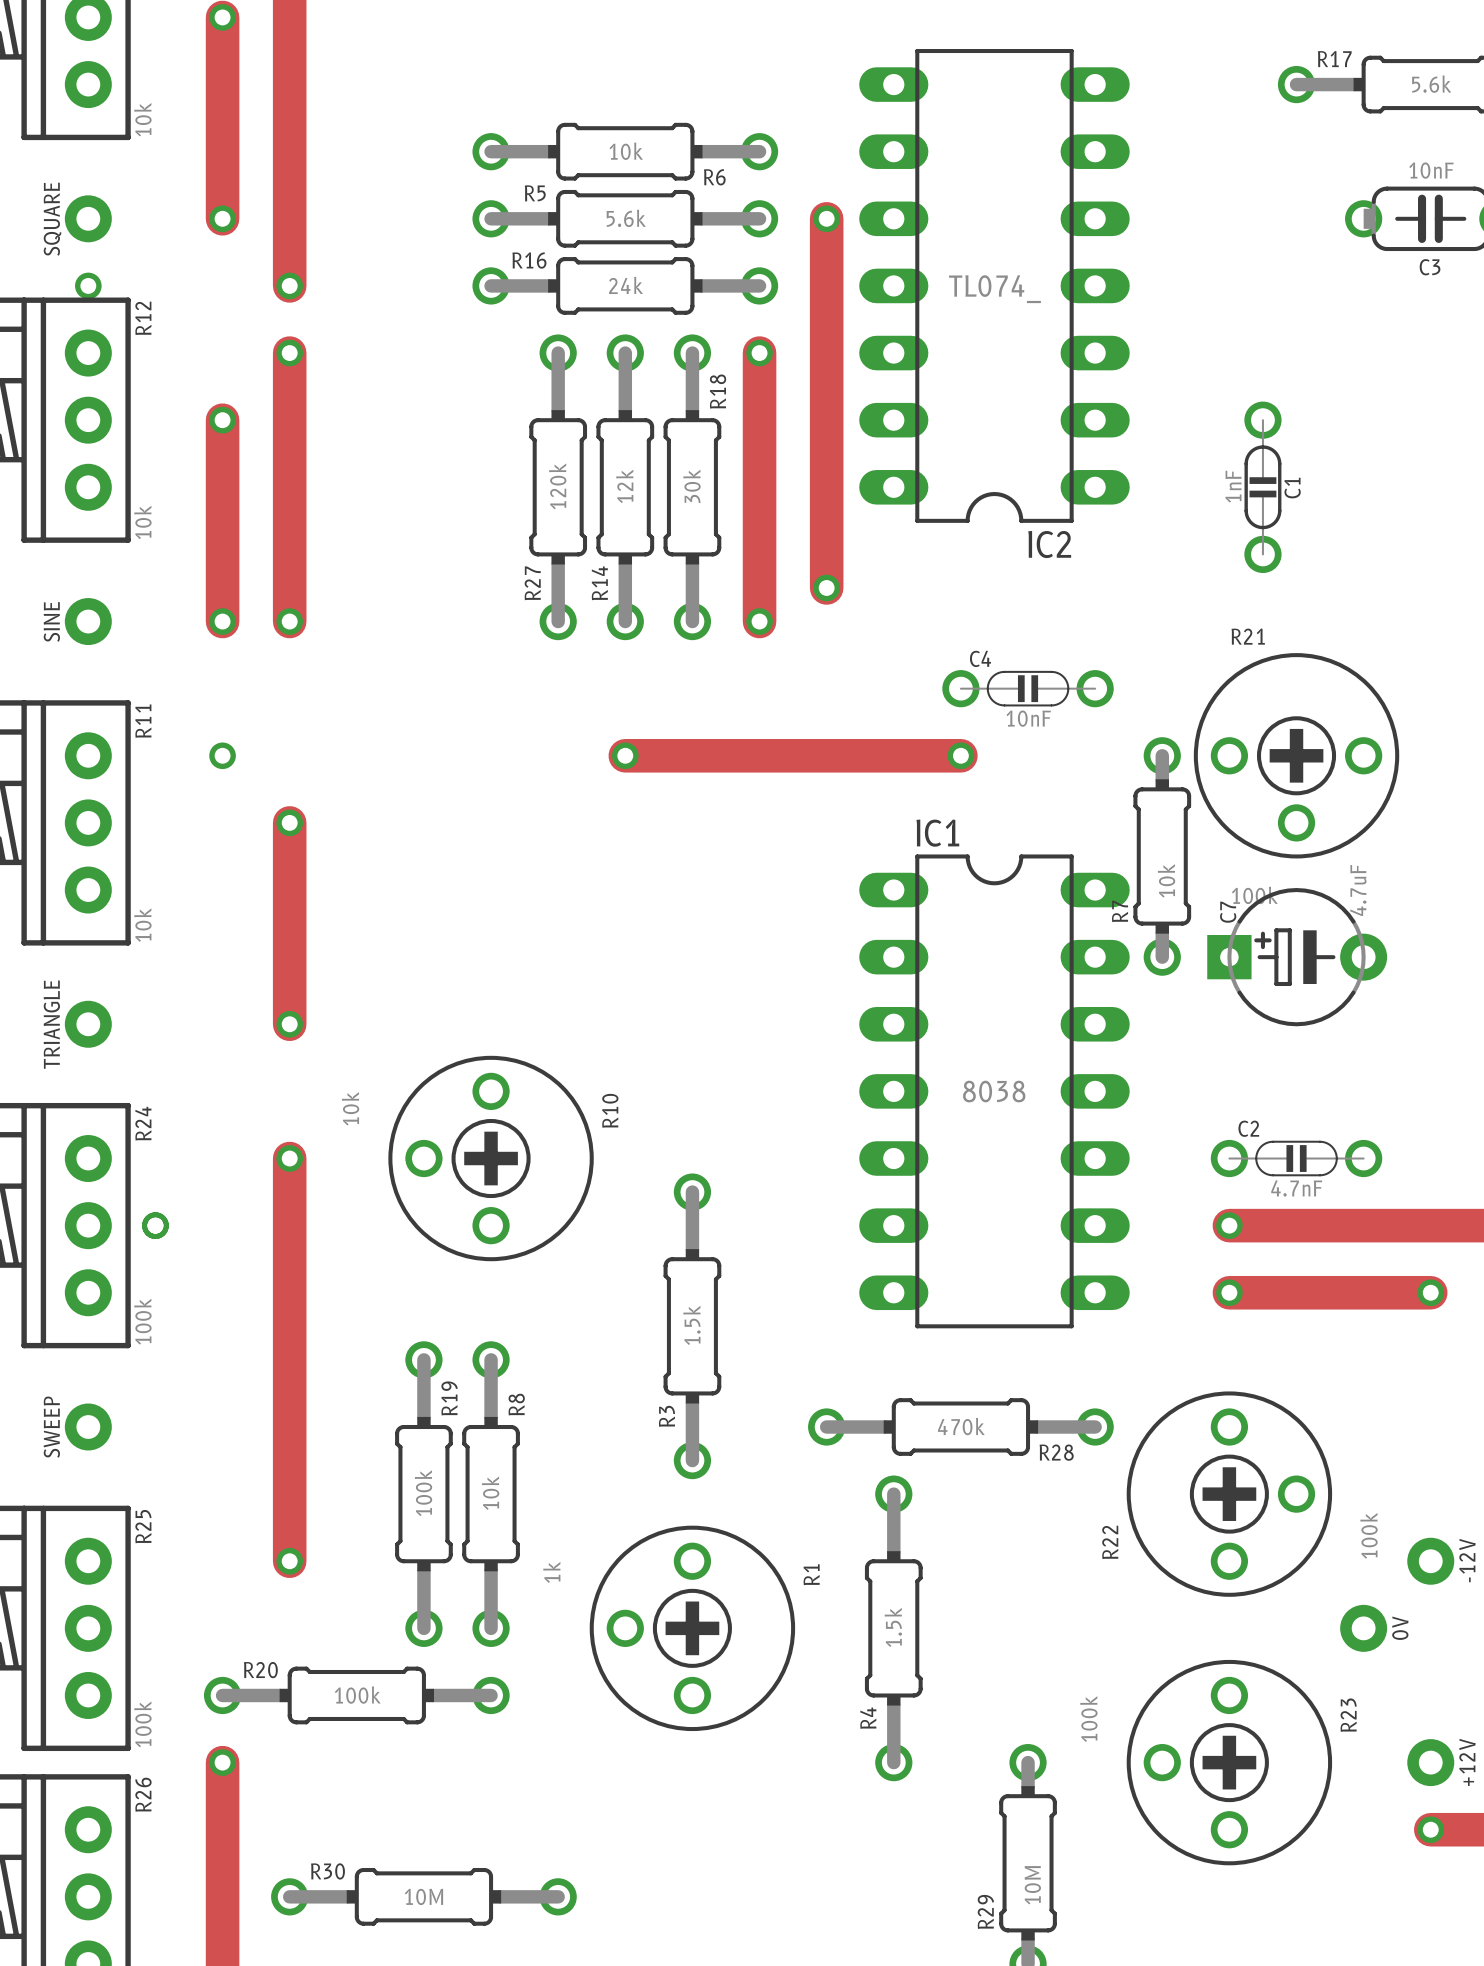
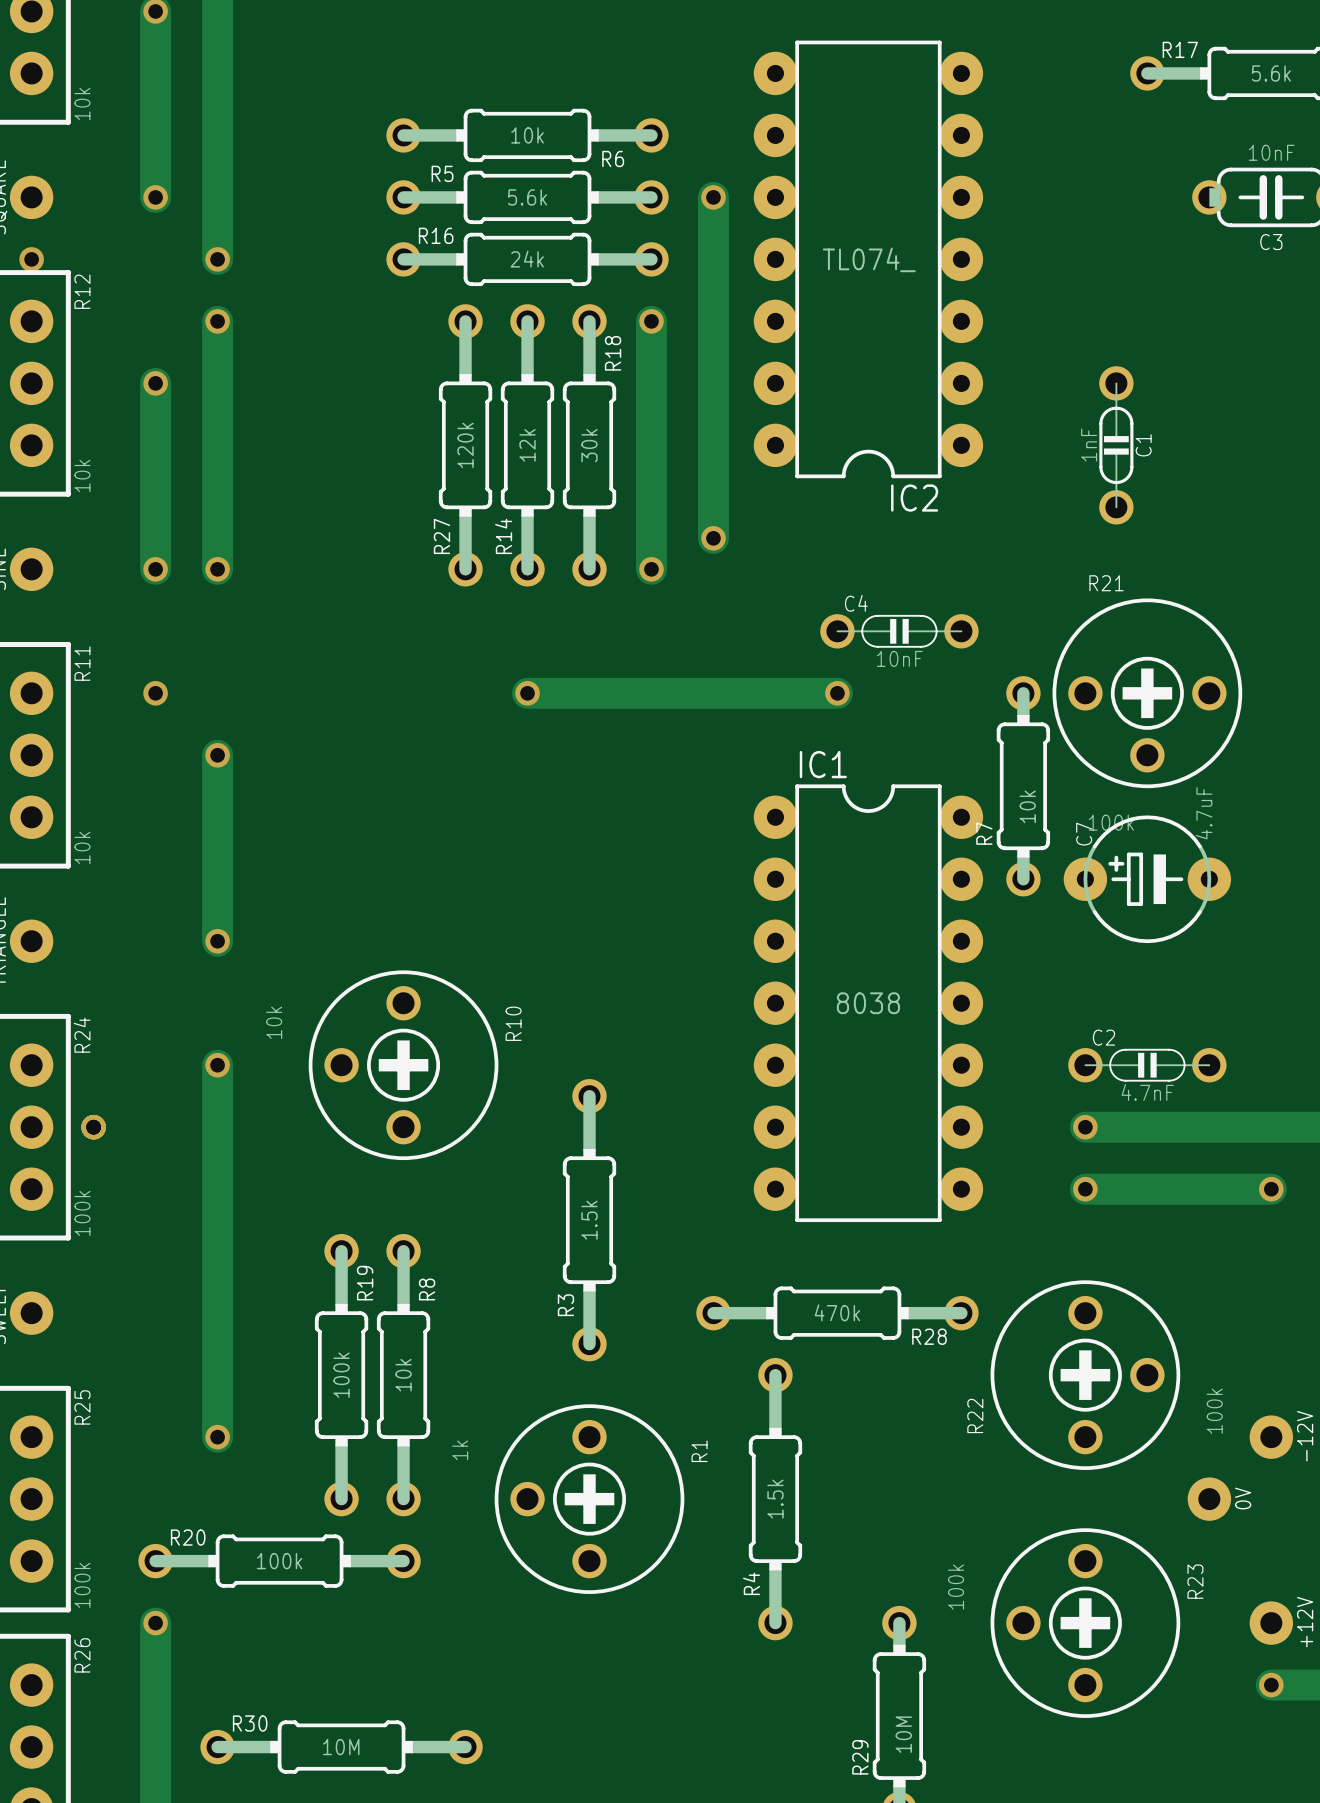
IC2 footprint: [859, 48, 1130, 523] -> [753, 40, 984, 479]
IC1 footprint: [859, 854, 1130, 1329] -> [753, 784, 984, 1223]
C7 footprint: [1207, 888, 1388, 1027] -> [1063, 815, 1232, 944]

